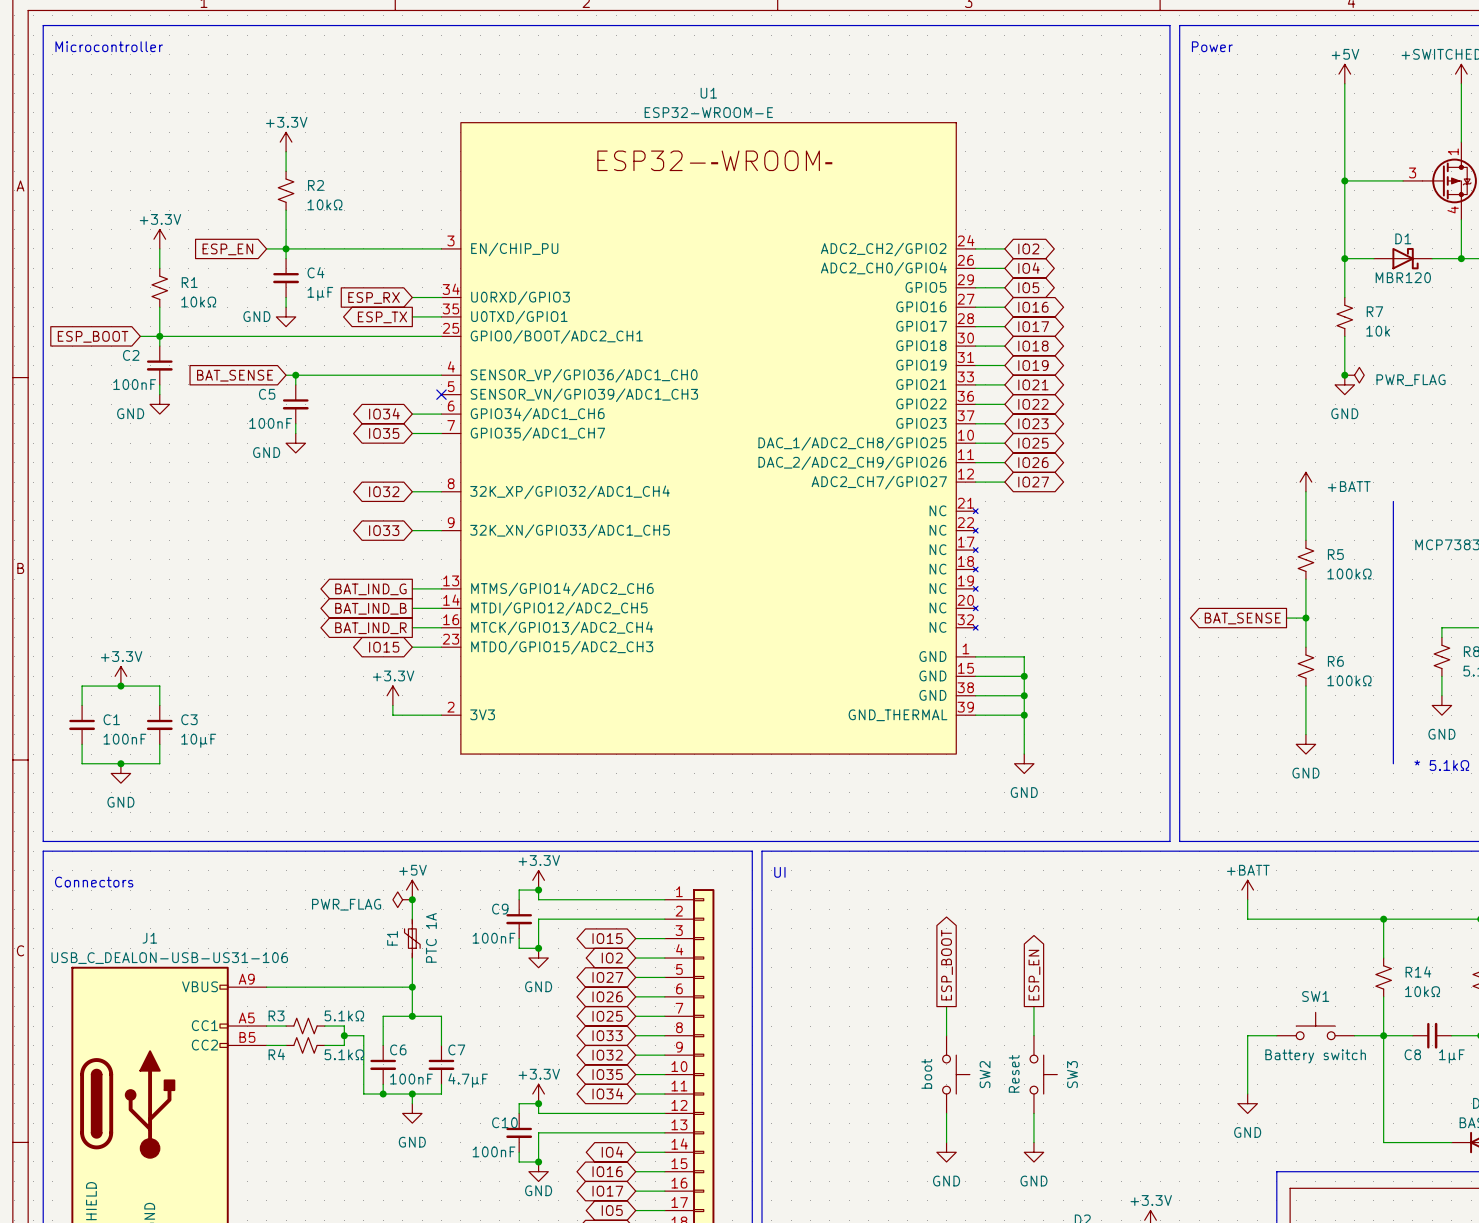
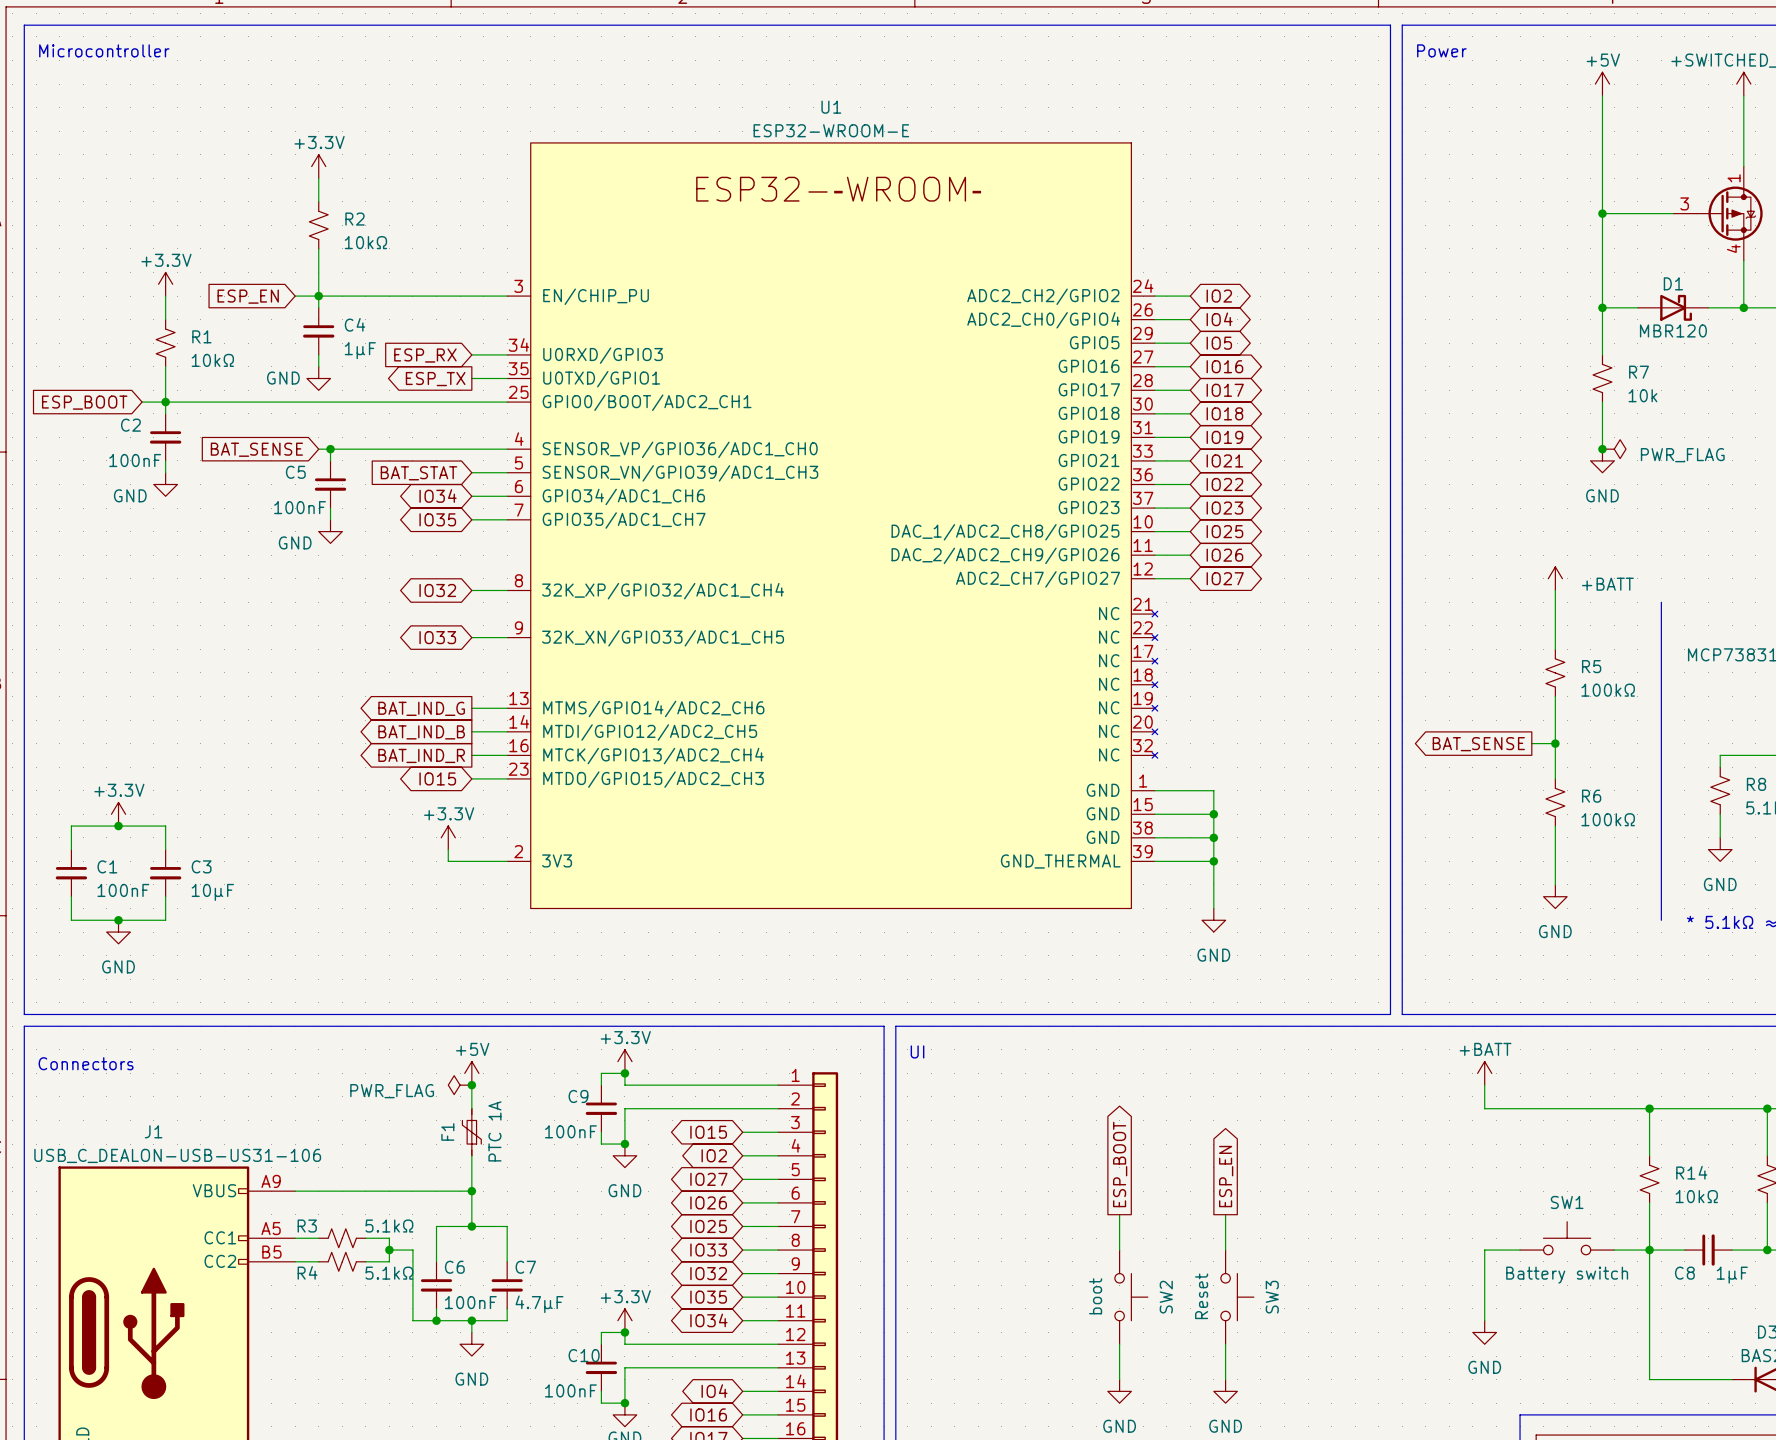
wire: none -> (471, 472) (507, 472)
no-connect mark: (441, 394) -> none
global label: none -> BAT_STAT (418, 473)

